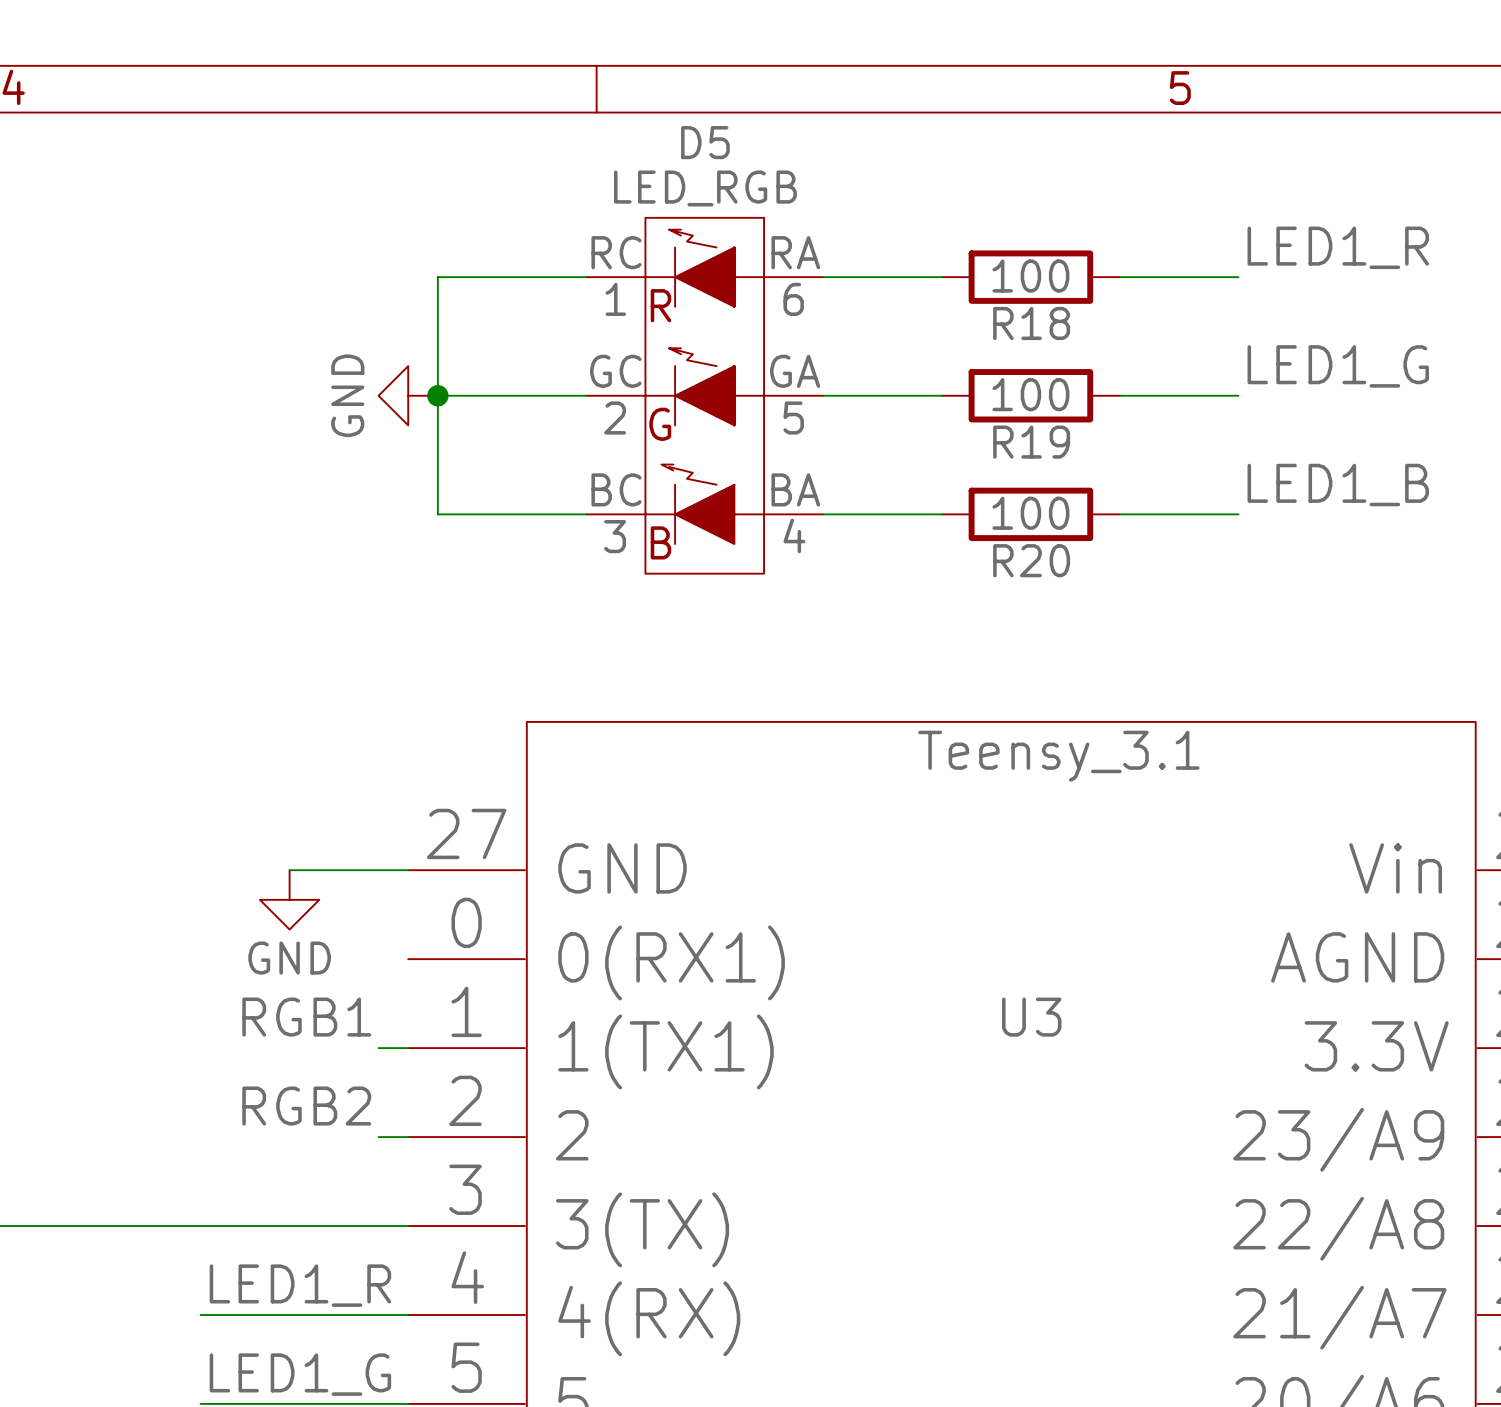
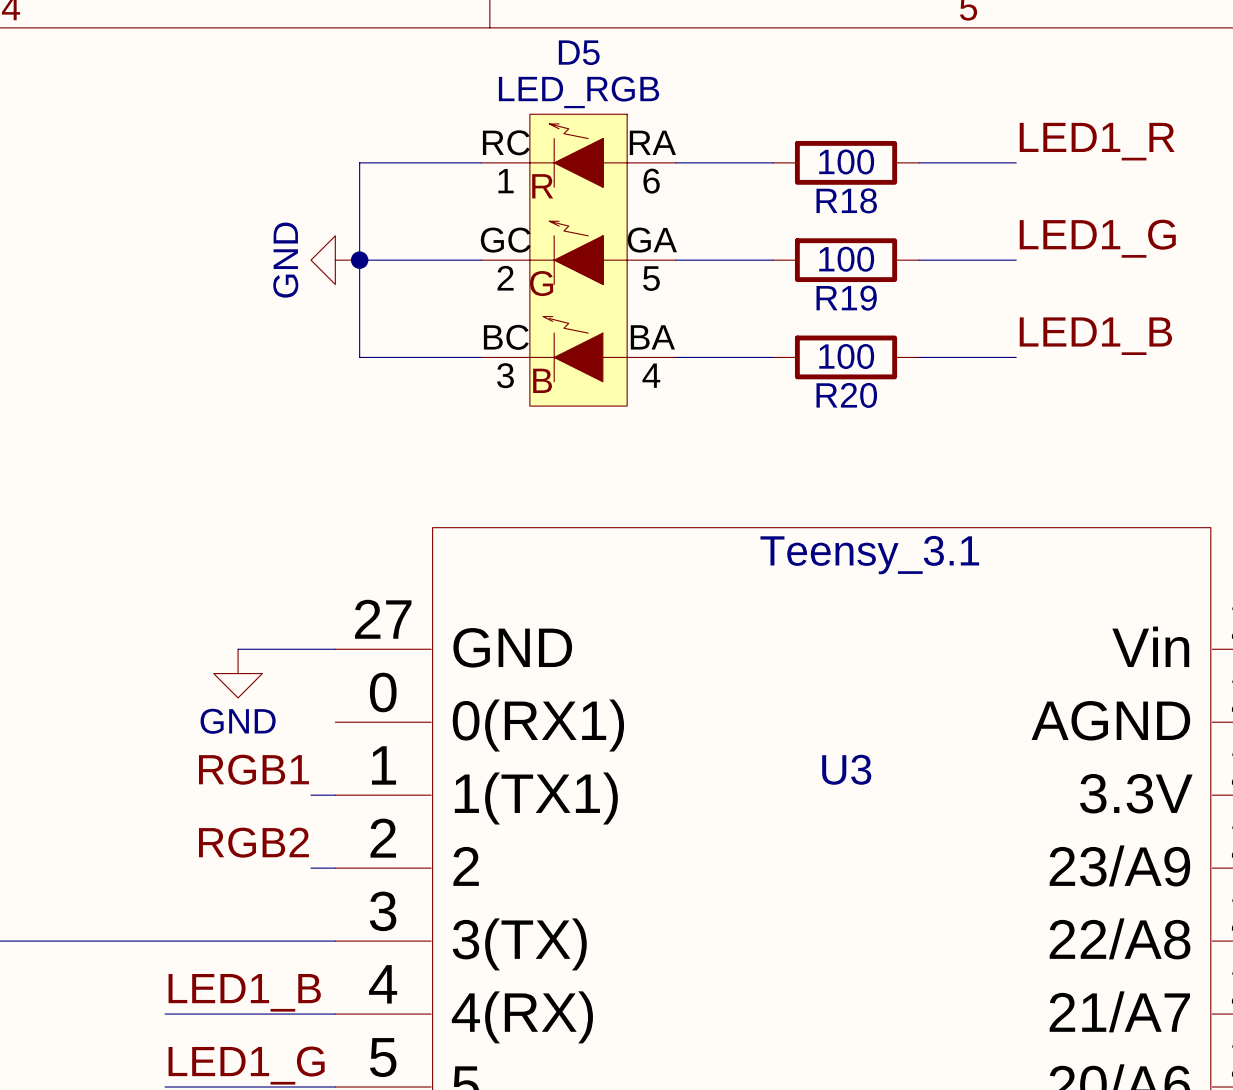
label: LED1_R (300, 1285) -> LED1_B (244, 992)

